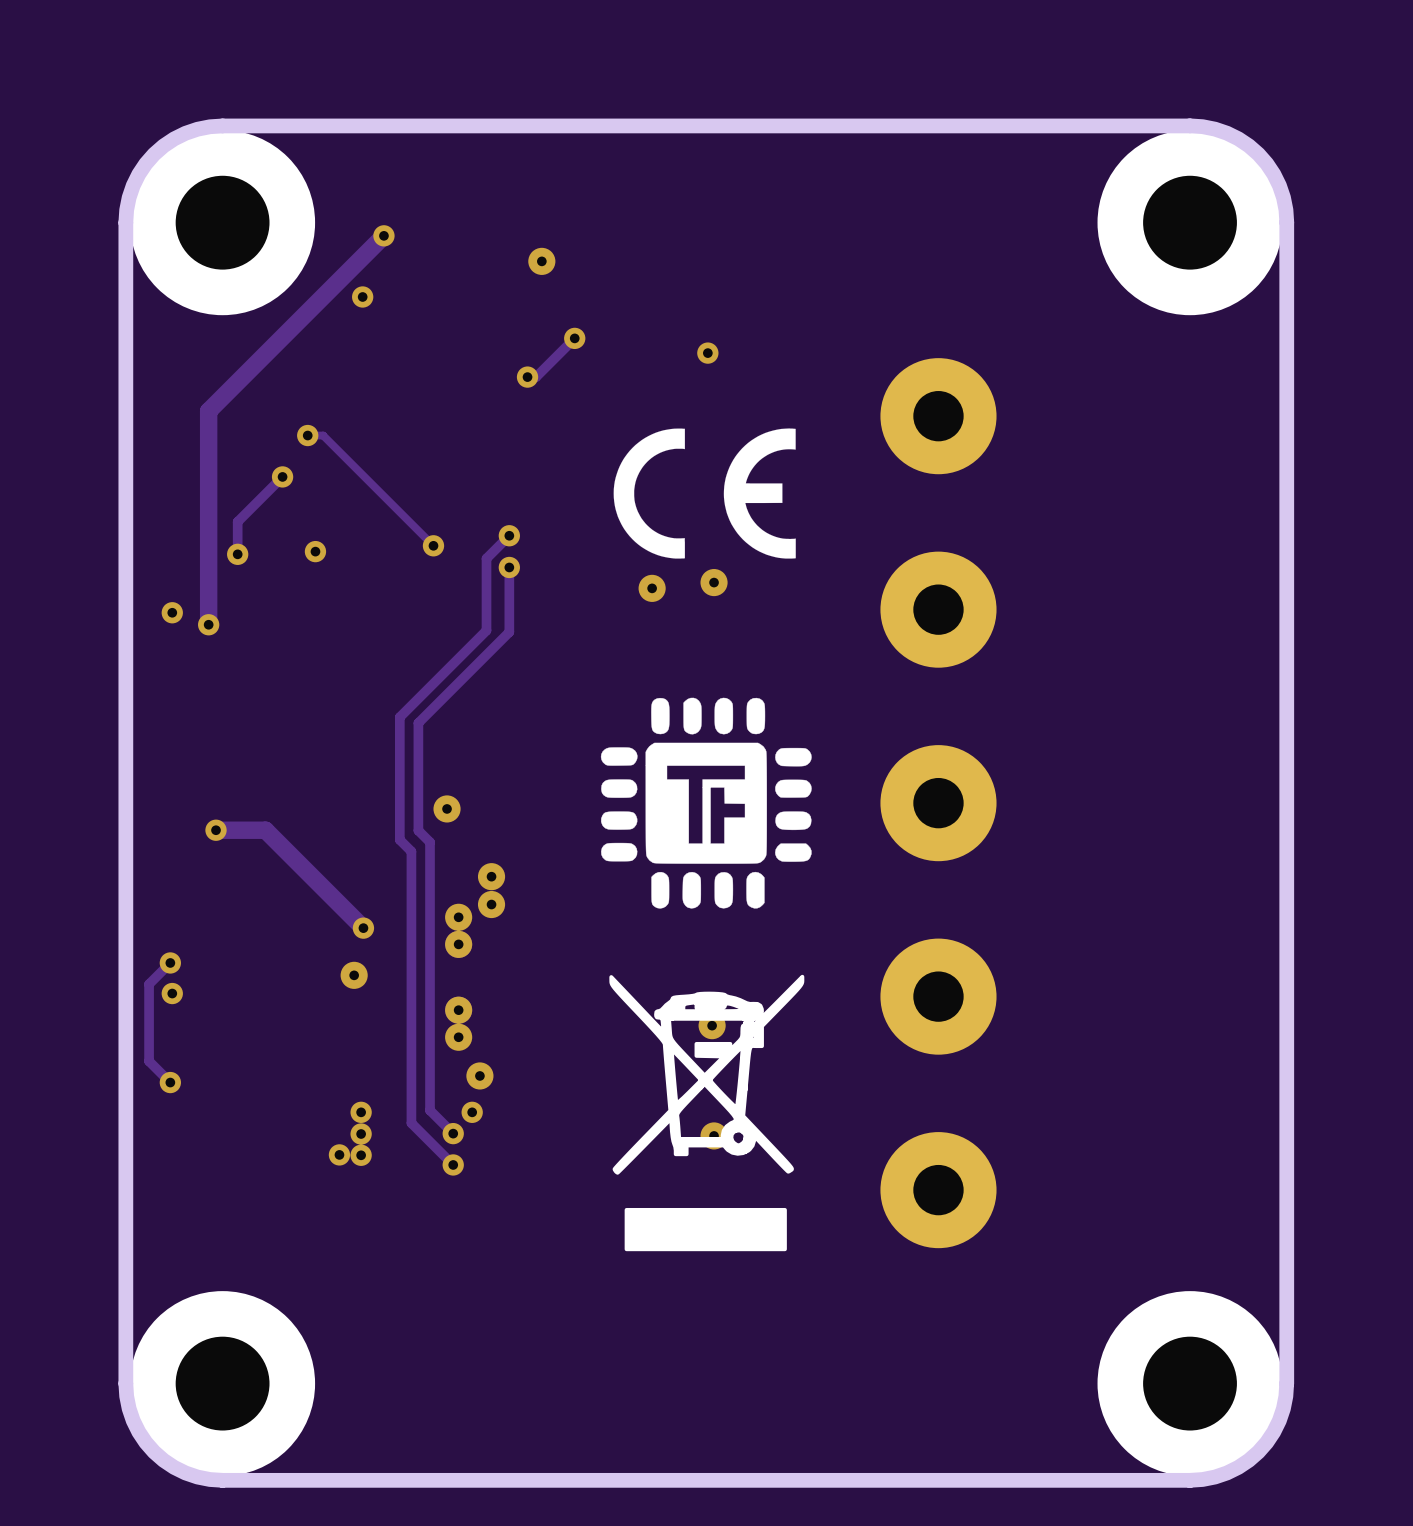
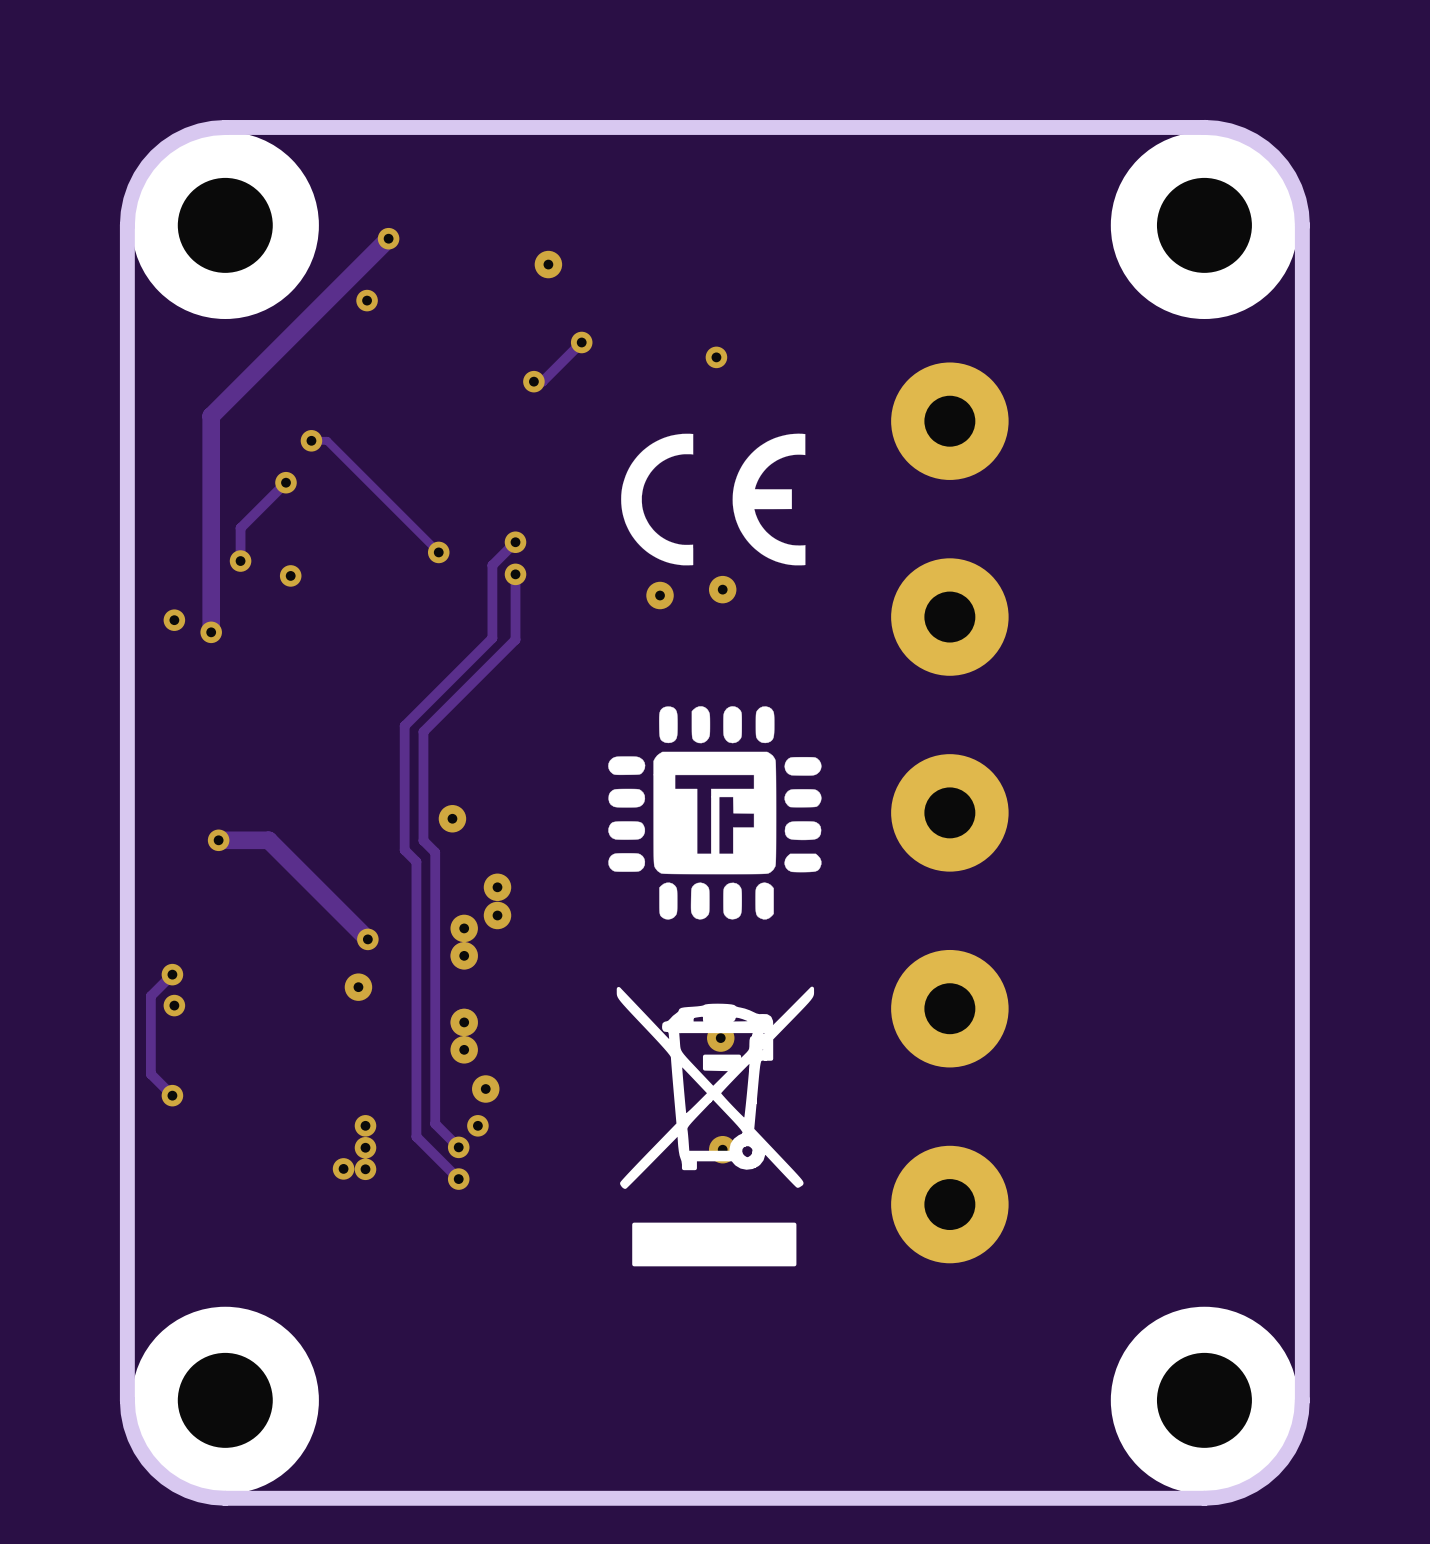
via position: (315, 551) -> (290, 575)

